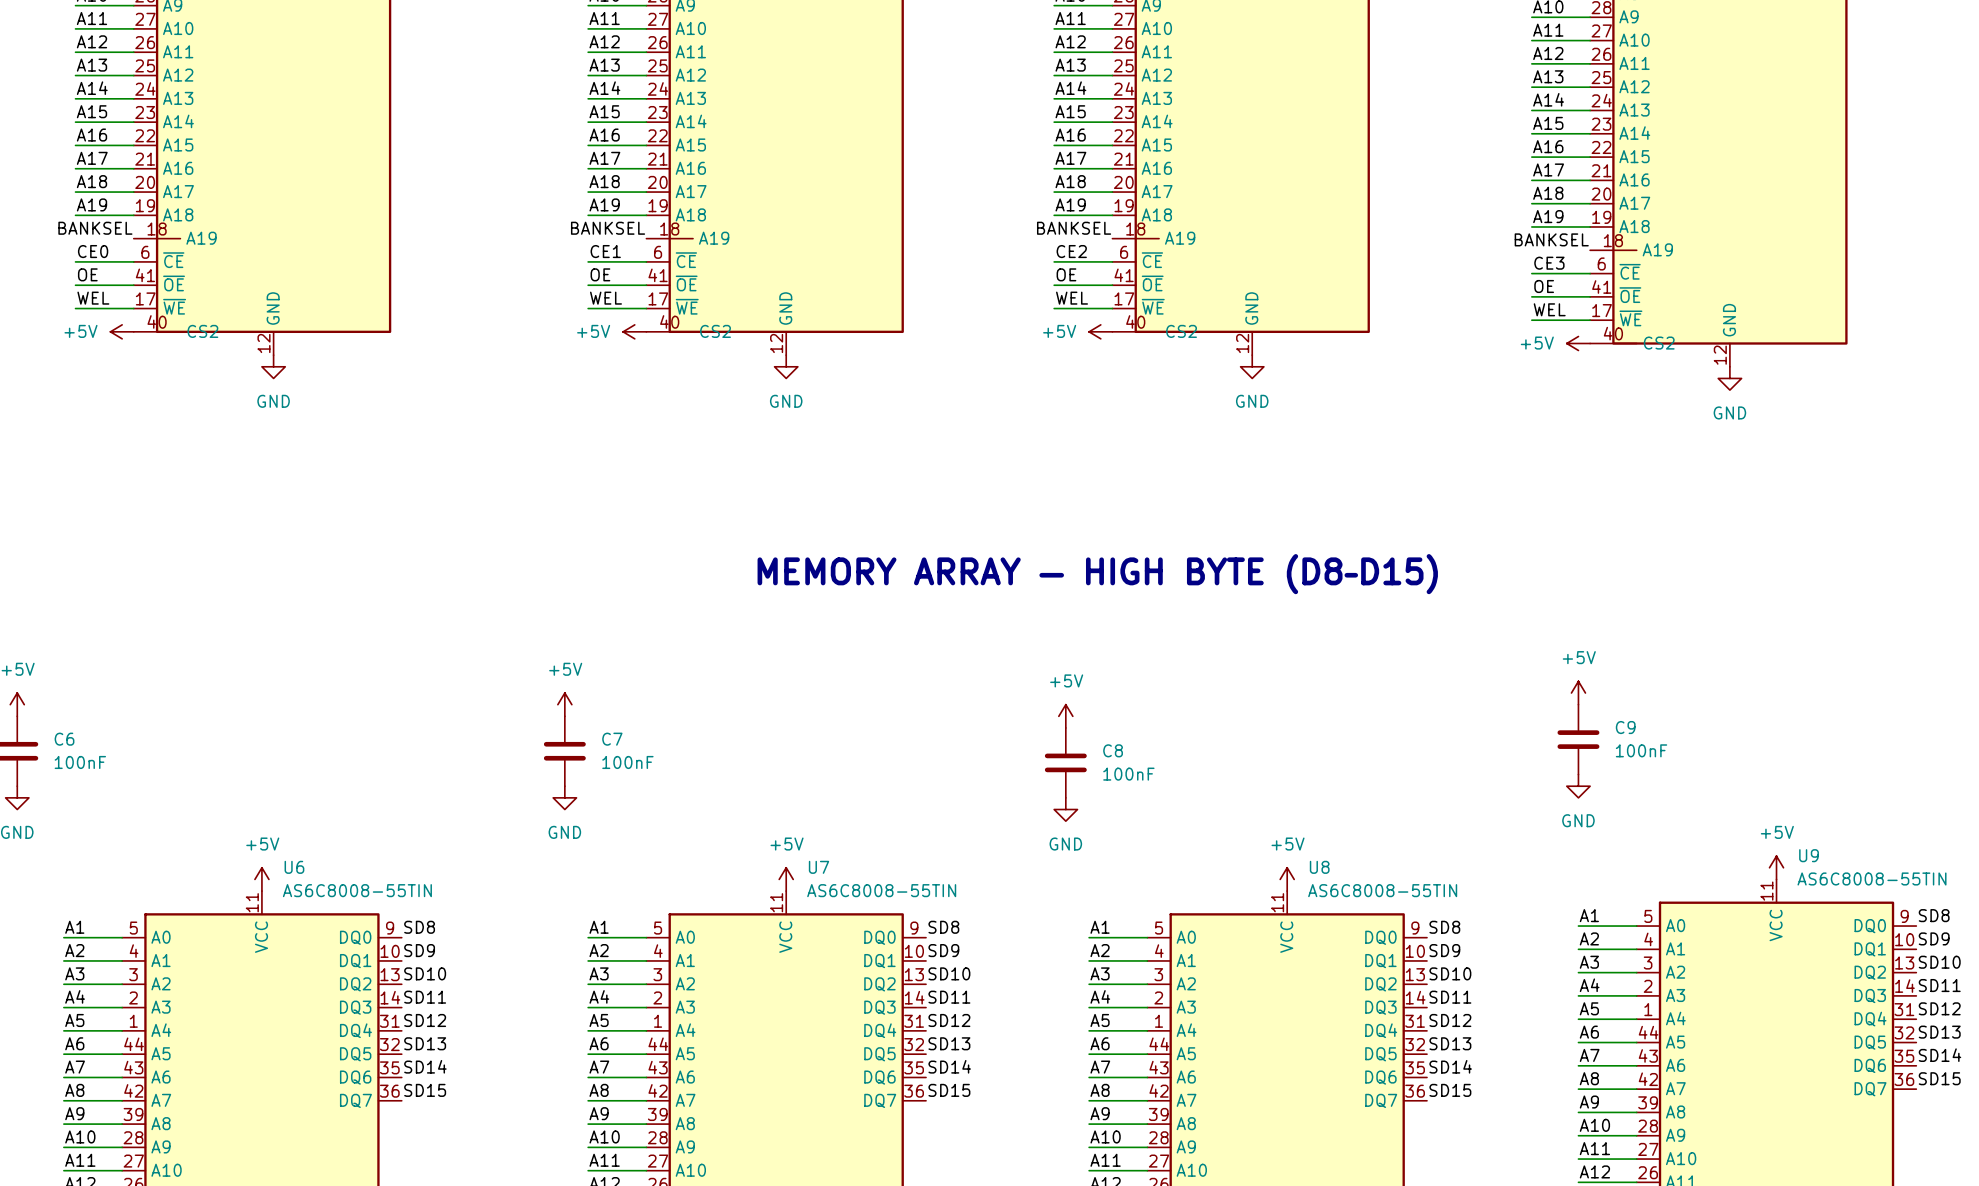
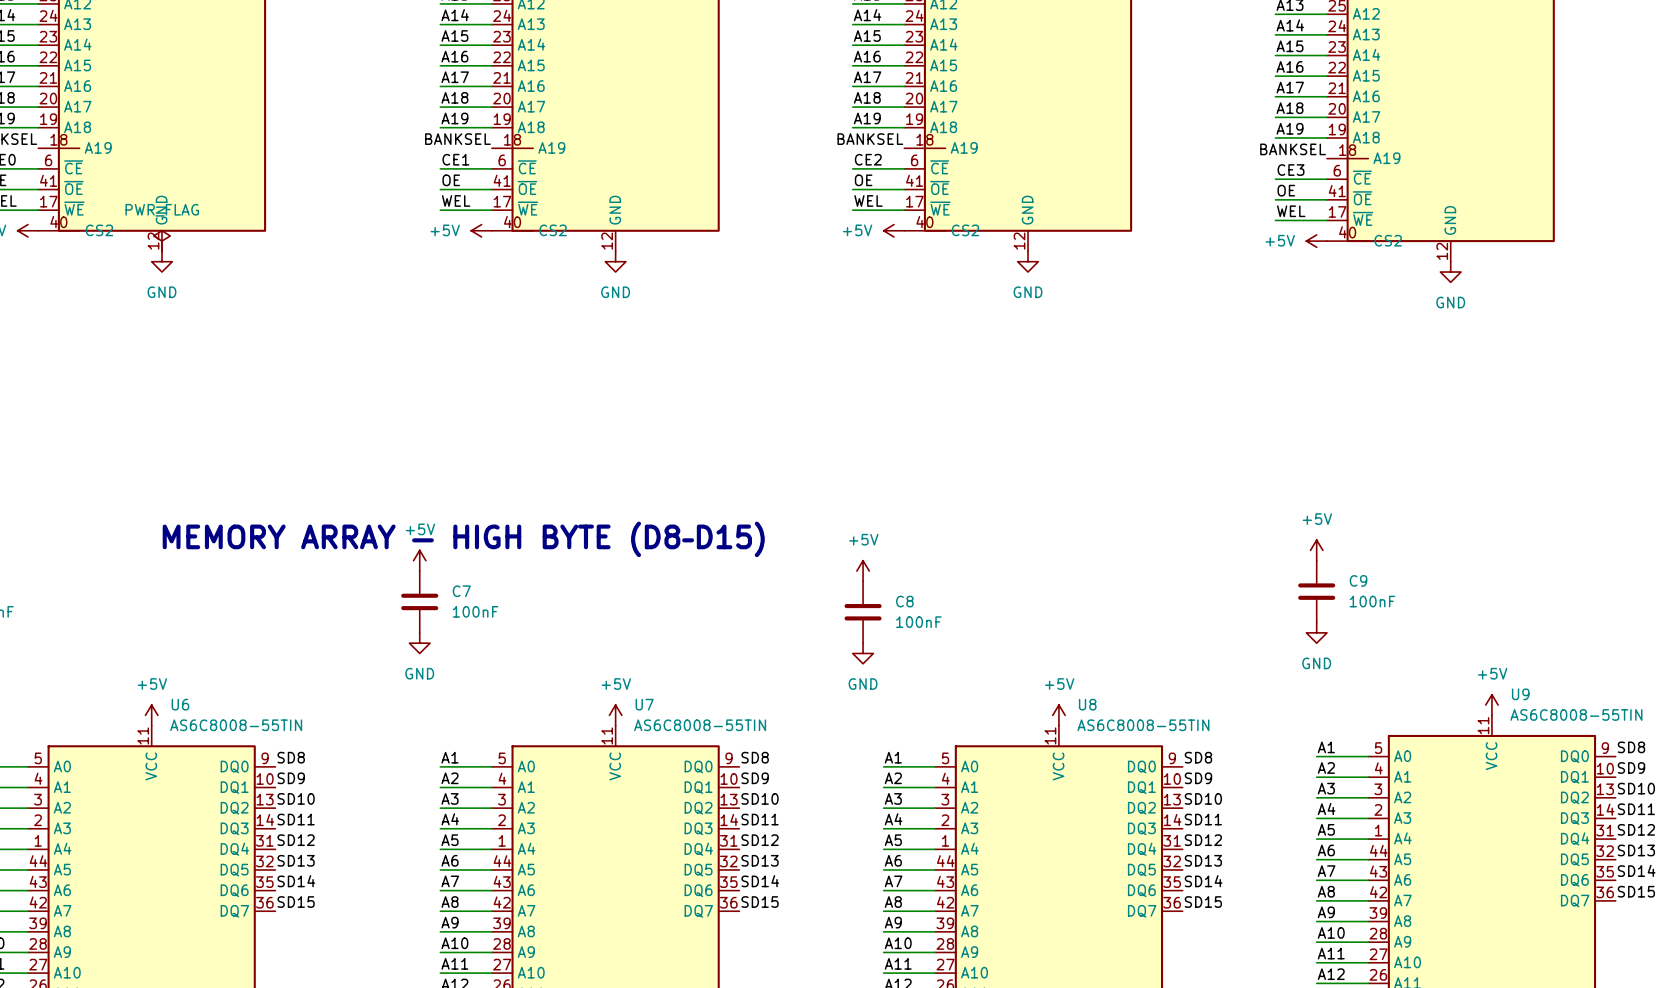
power symbol: none -> PWR_FLAG (161, 241)
text: MEMORY ARRAY — HIGH BYTE (D8–D15) (1097, 574) -> none
text: none -> MEMORY ARRAY — HIGH BYTE (D8–D15) (463, 539)

